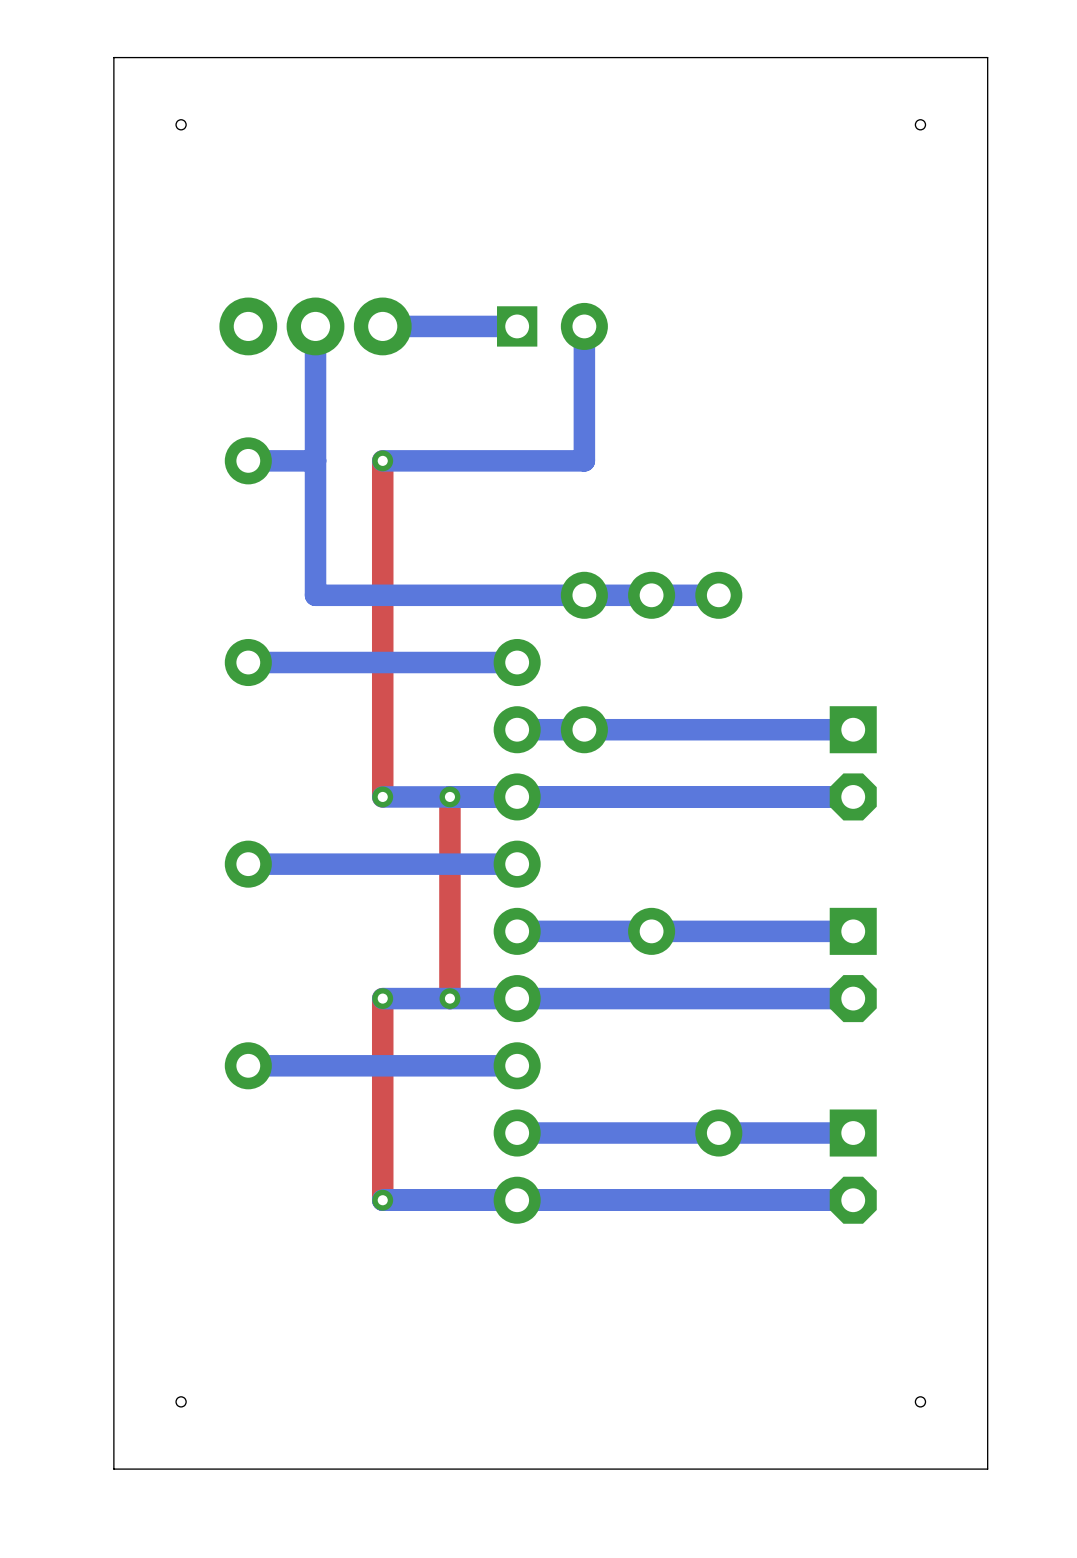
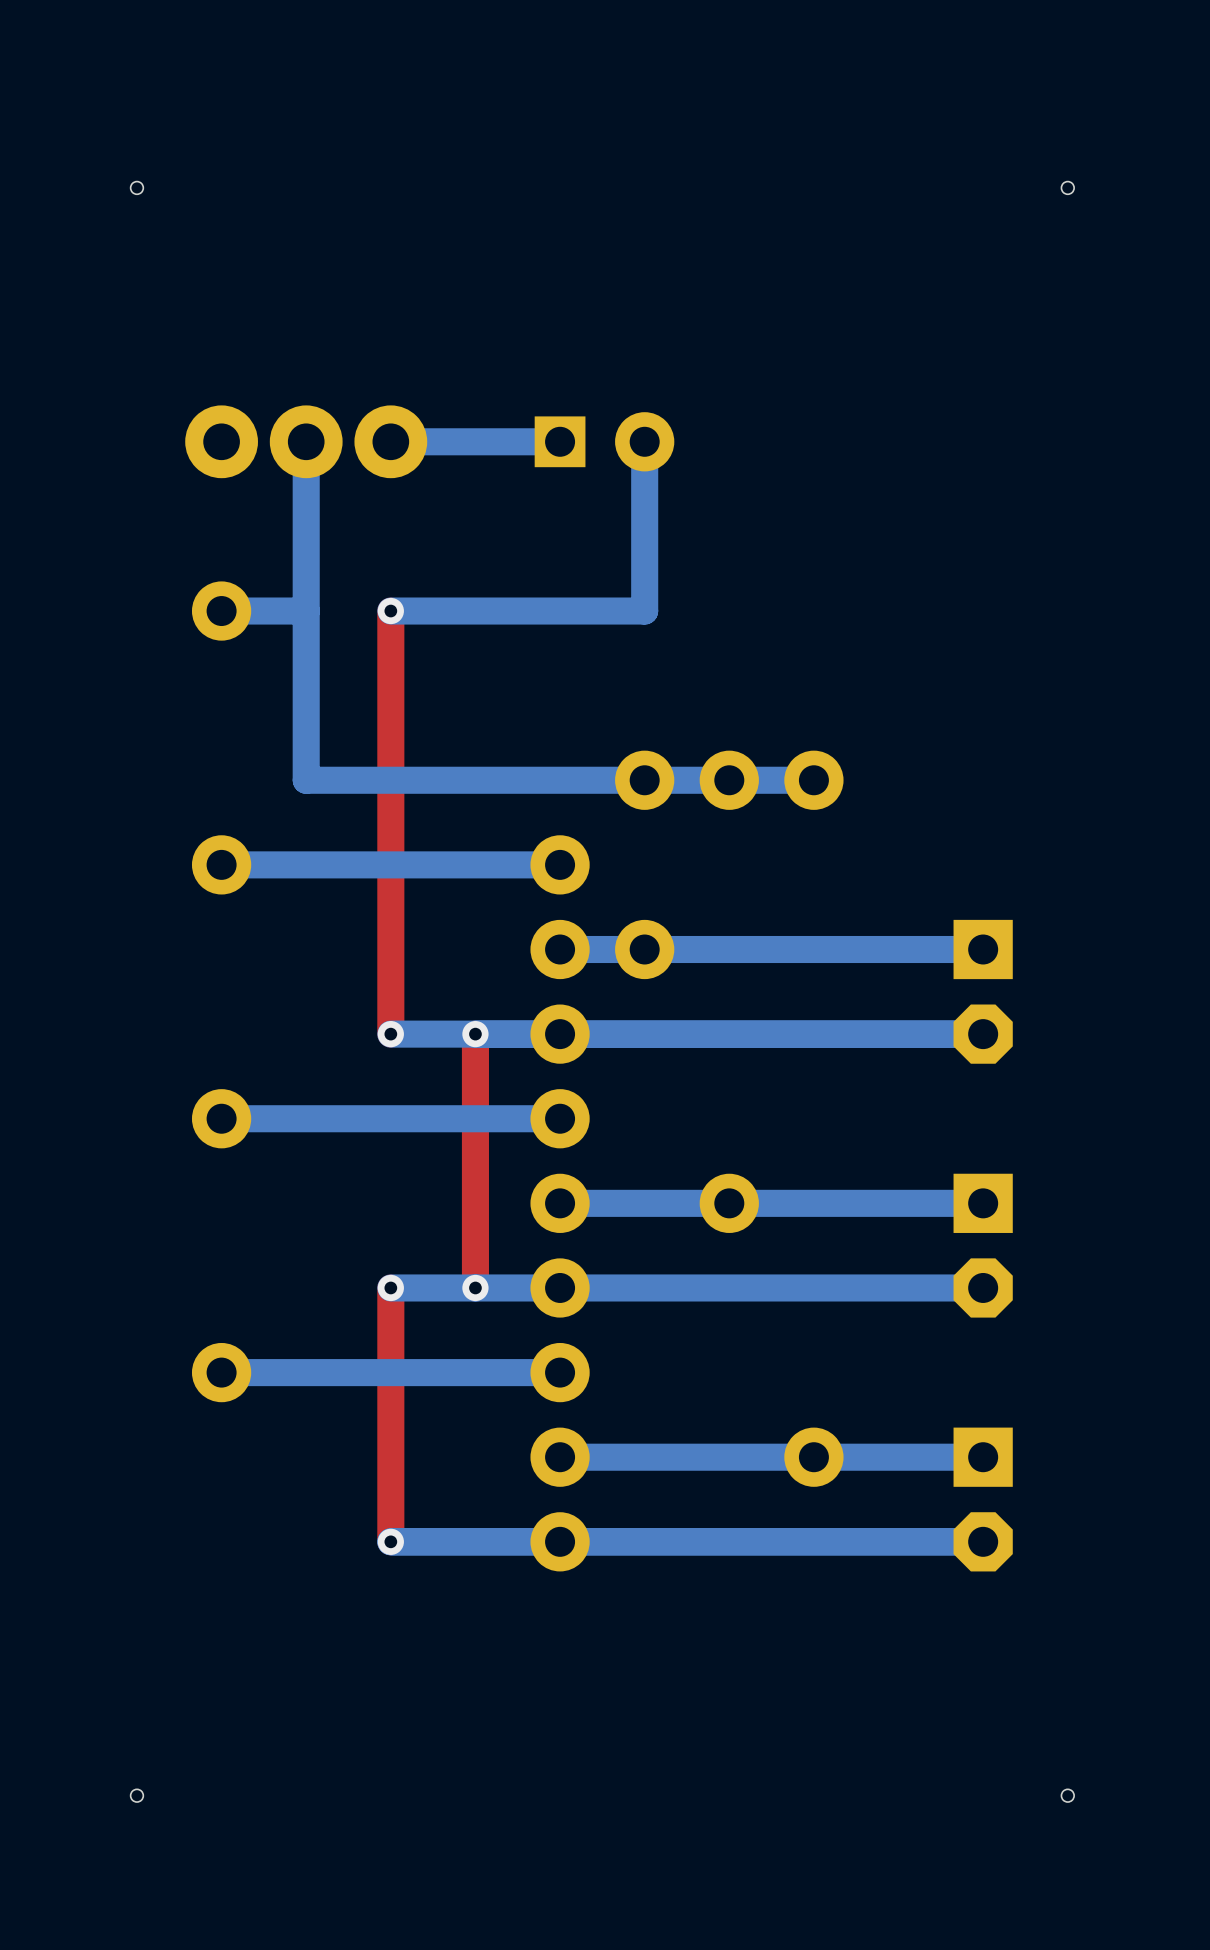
board edge: (987, 57) (113, 57) (113, 1469) (987, 1469) (987, 57) -> none

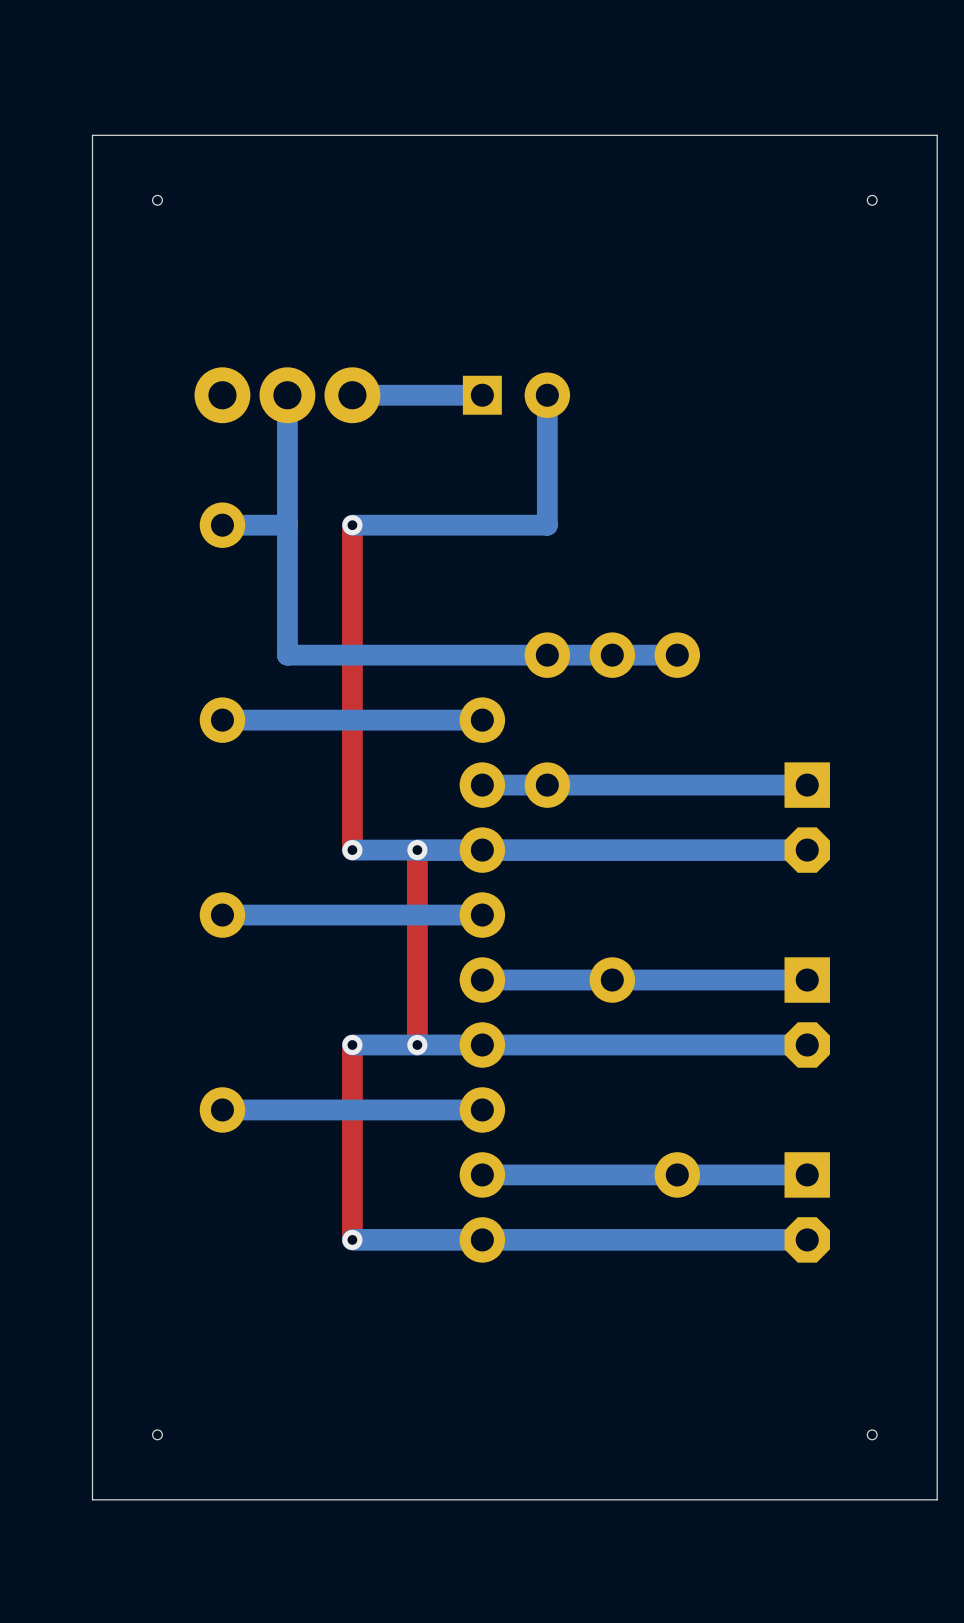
board edge: none -> (937, 135) (92, 135) (92, 1499) (937, 1499) (937, 135)

